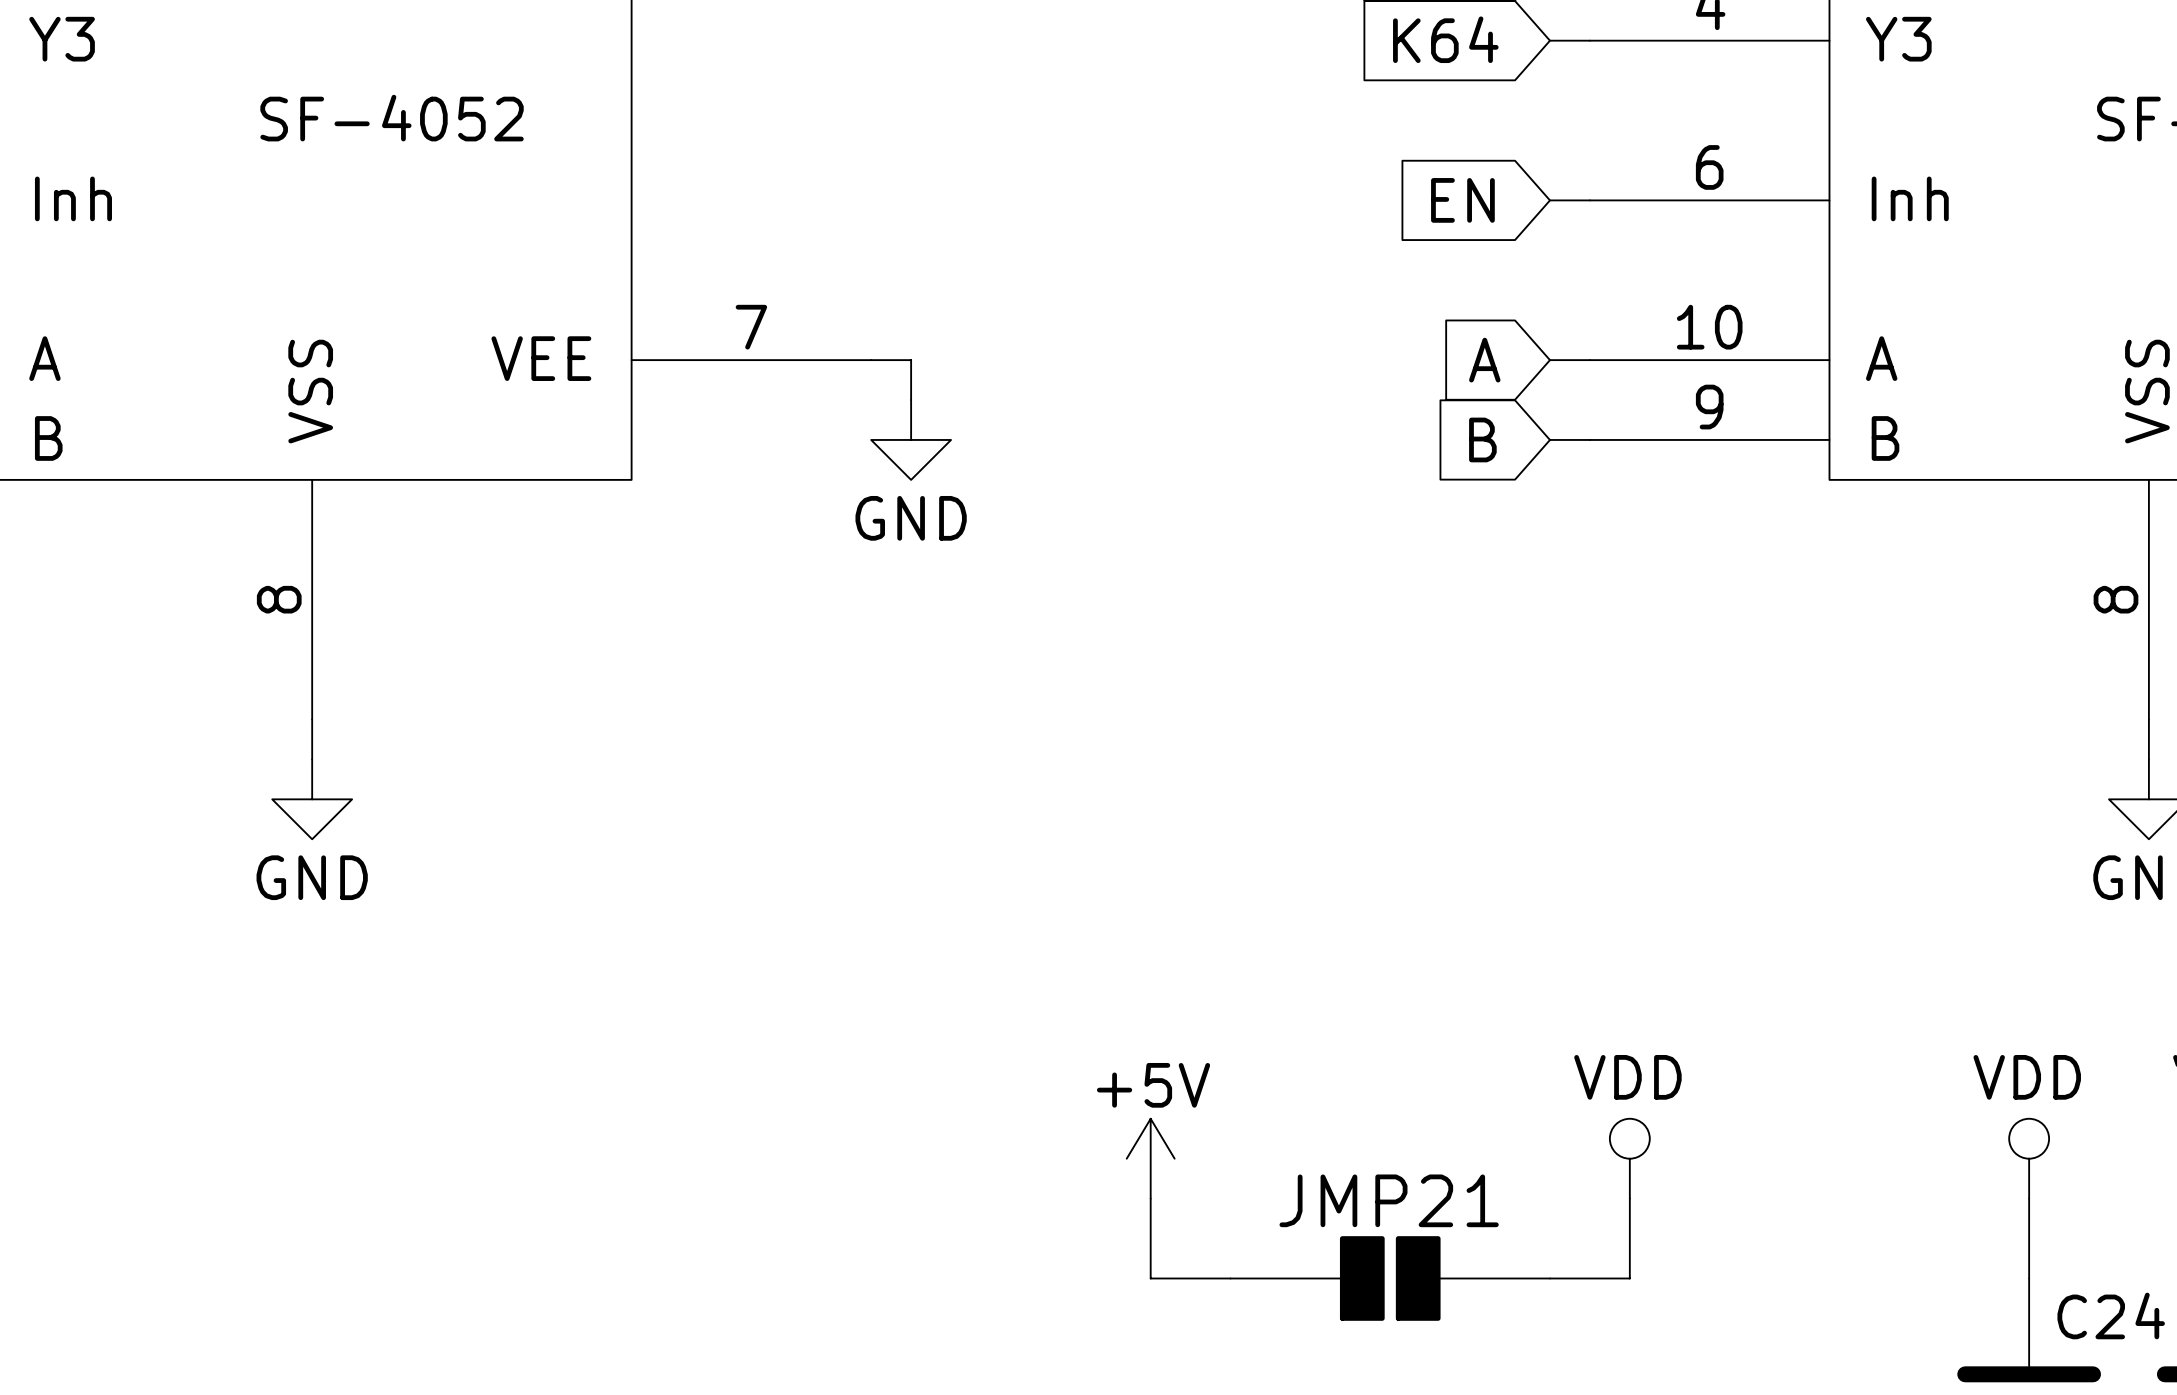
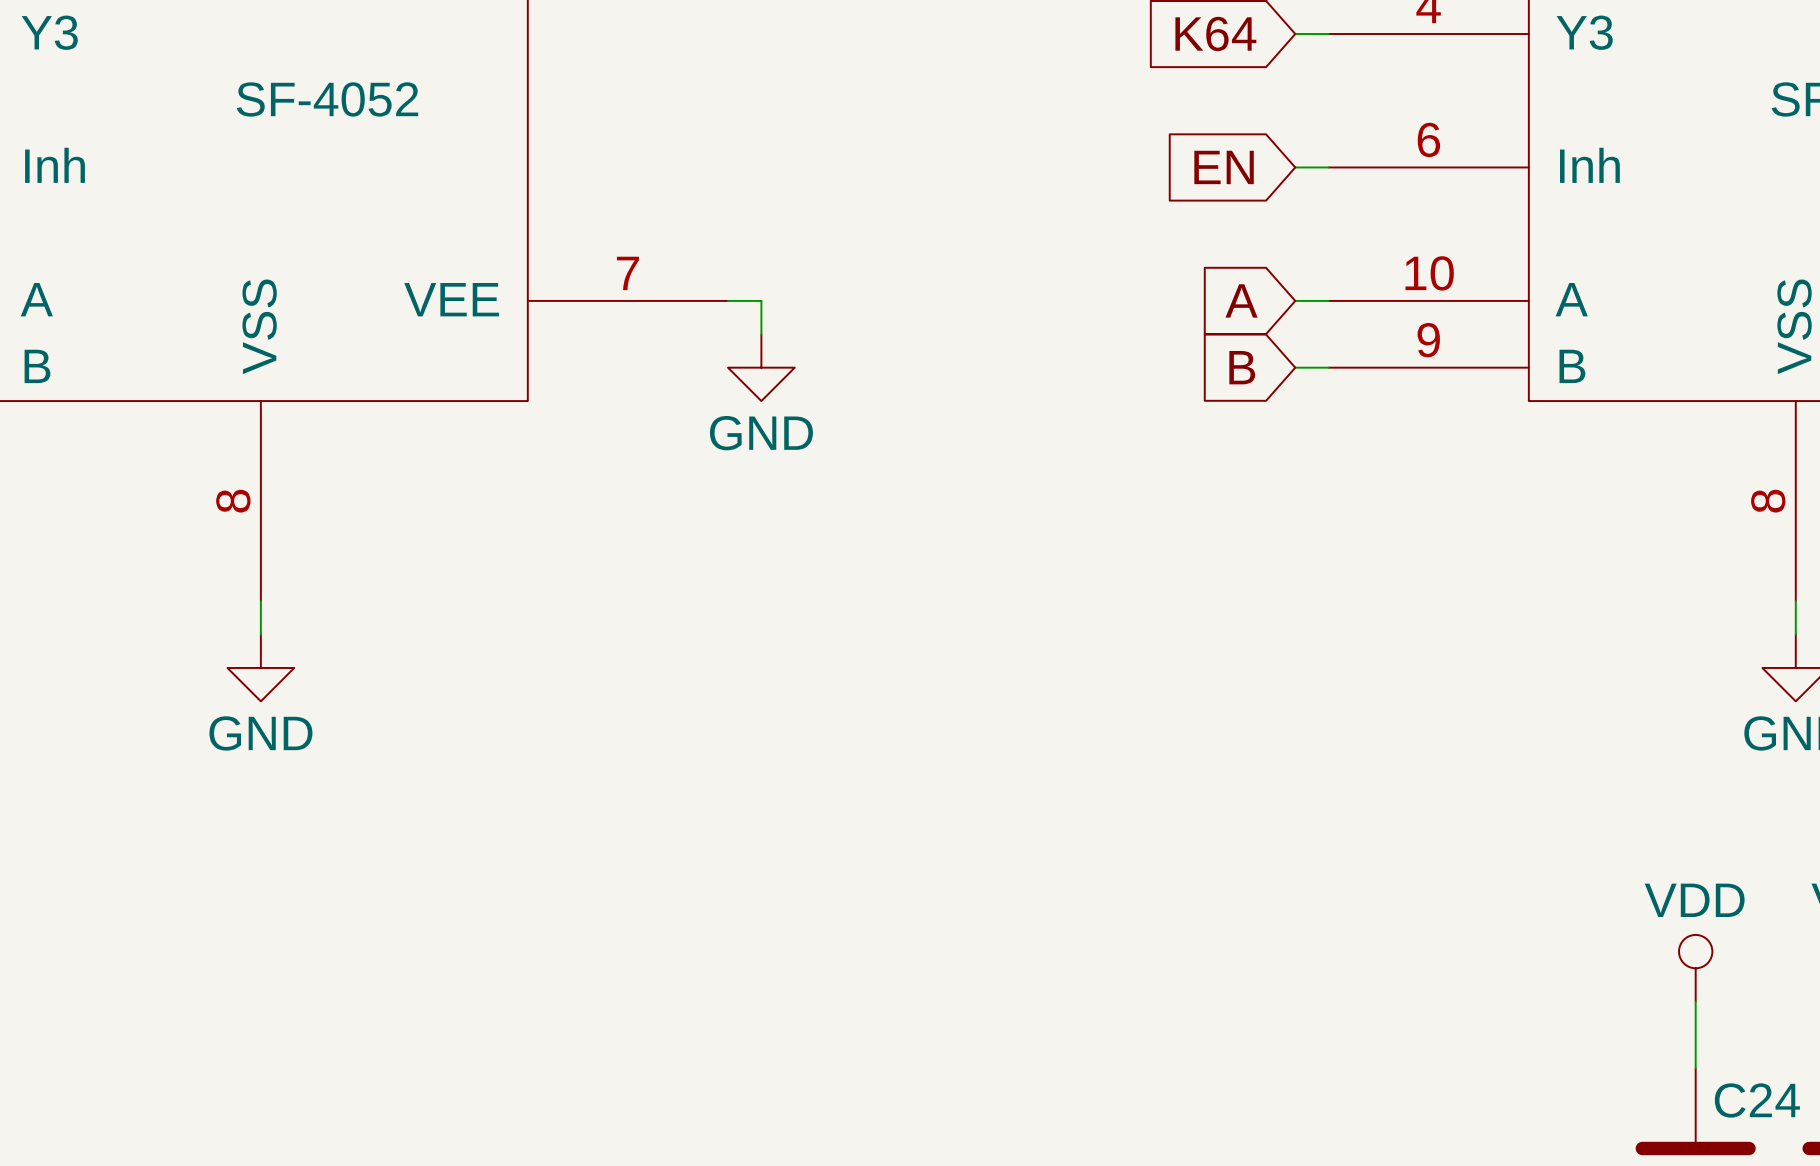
power symbol: +5V (1150, 1158) -> none
power symbol: VDD (1629, 1158) -> none
wire: (1150, 1198) (1150, 1278) (1230, 1278) -> none
wire: (1629, 1198) (1629, 1278) (1549, 1278) -> none
JMP21: (1390, 1278) -> none

